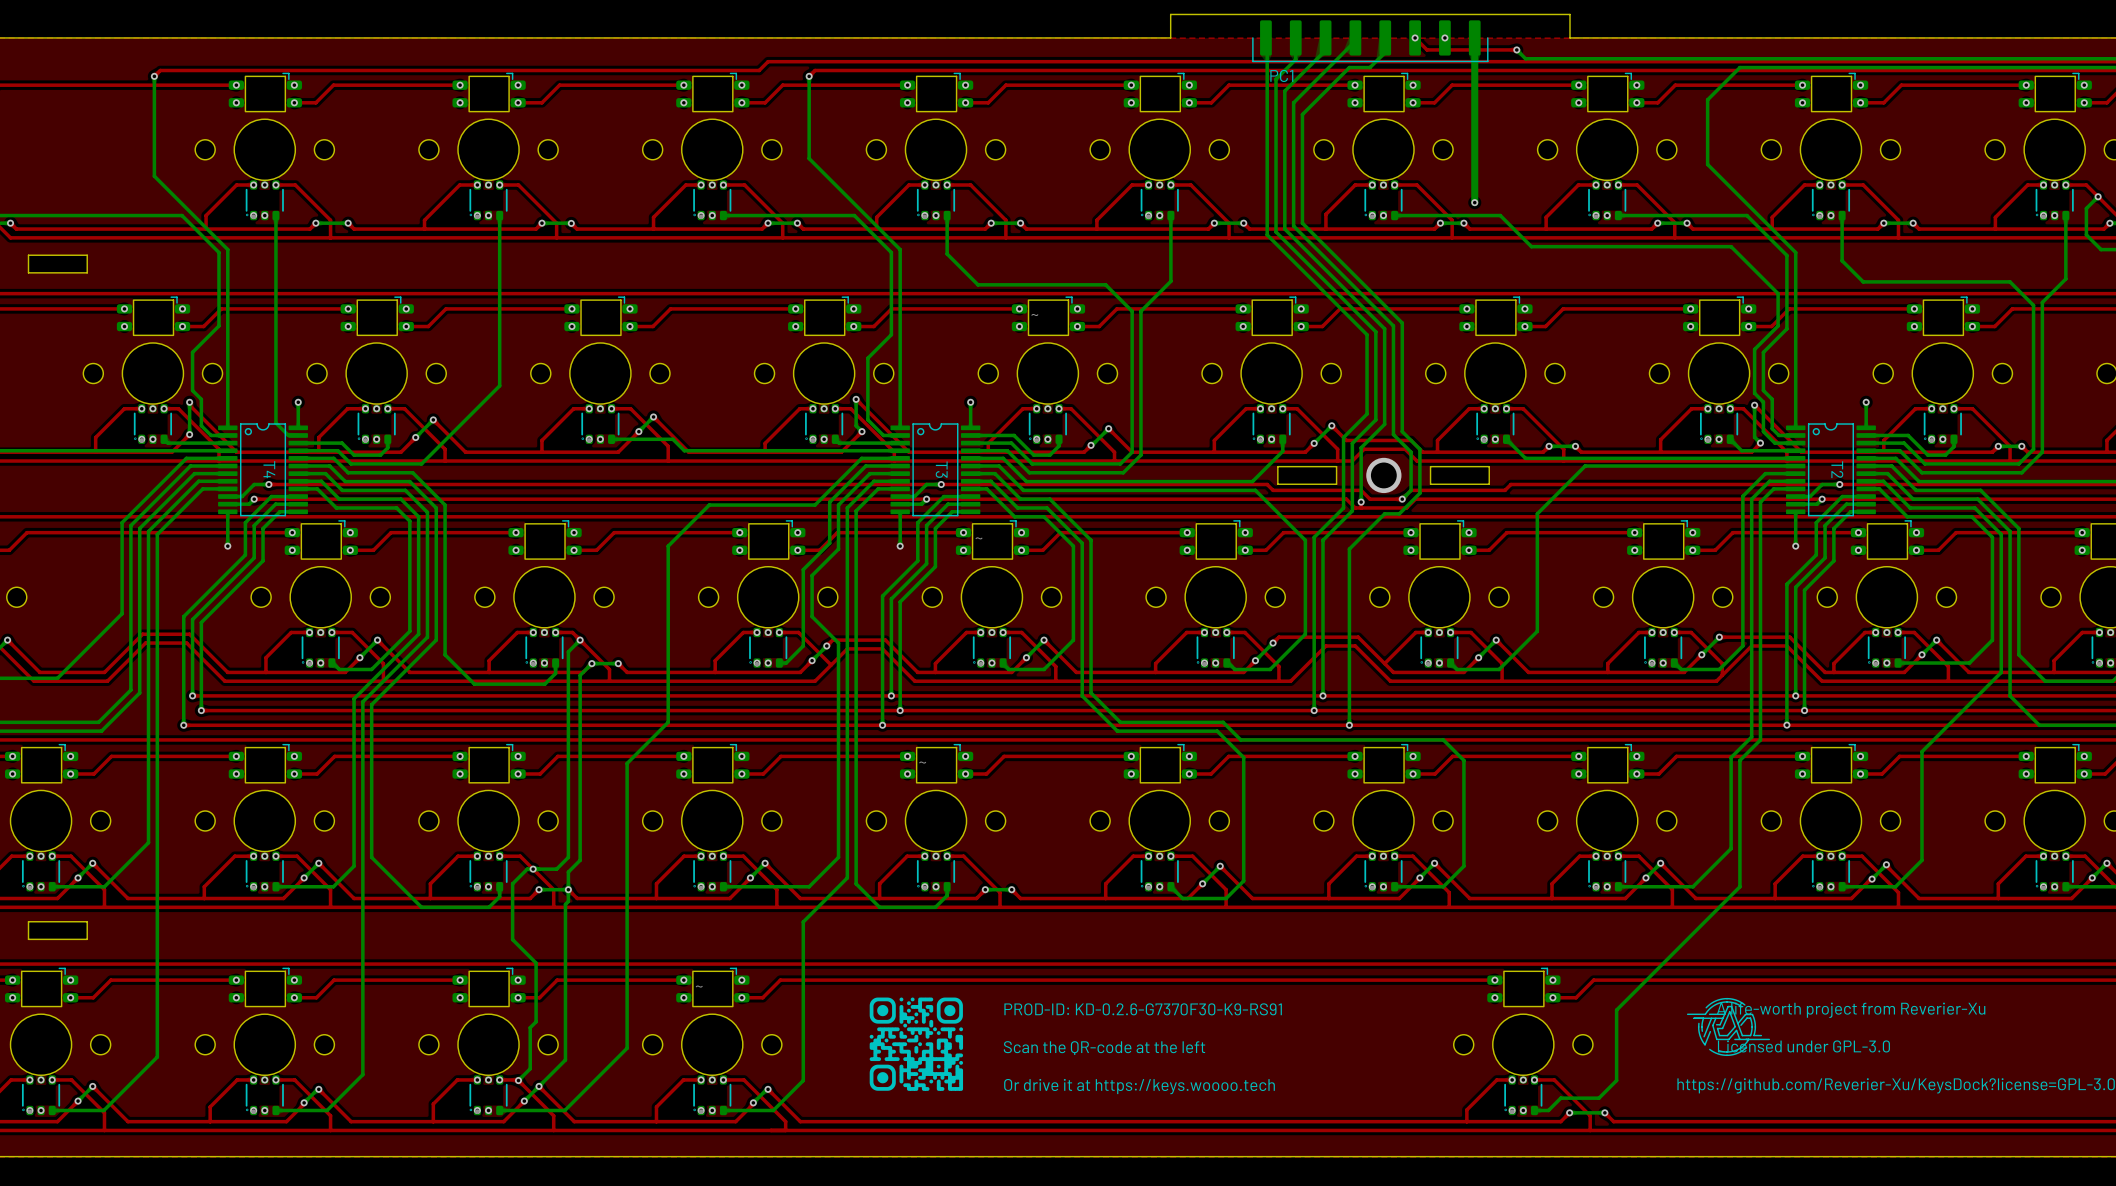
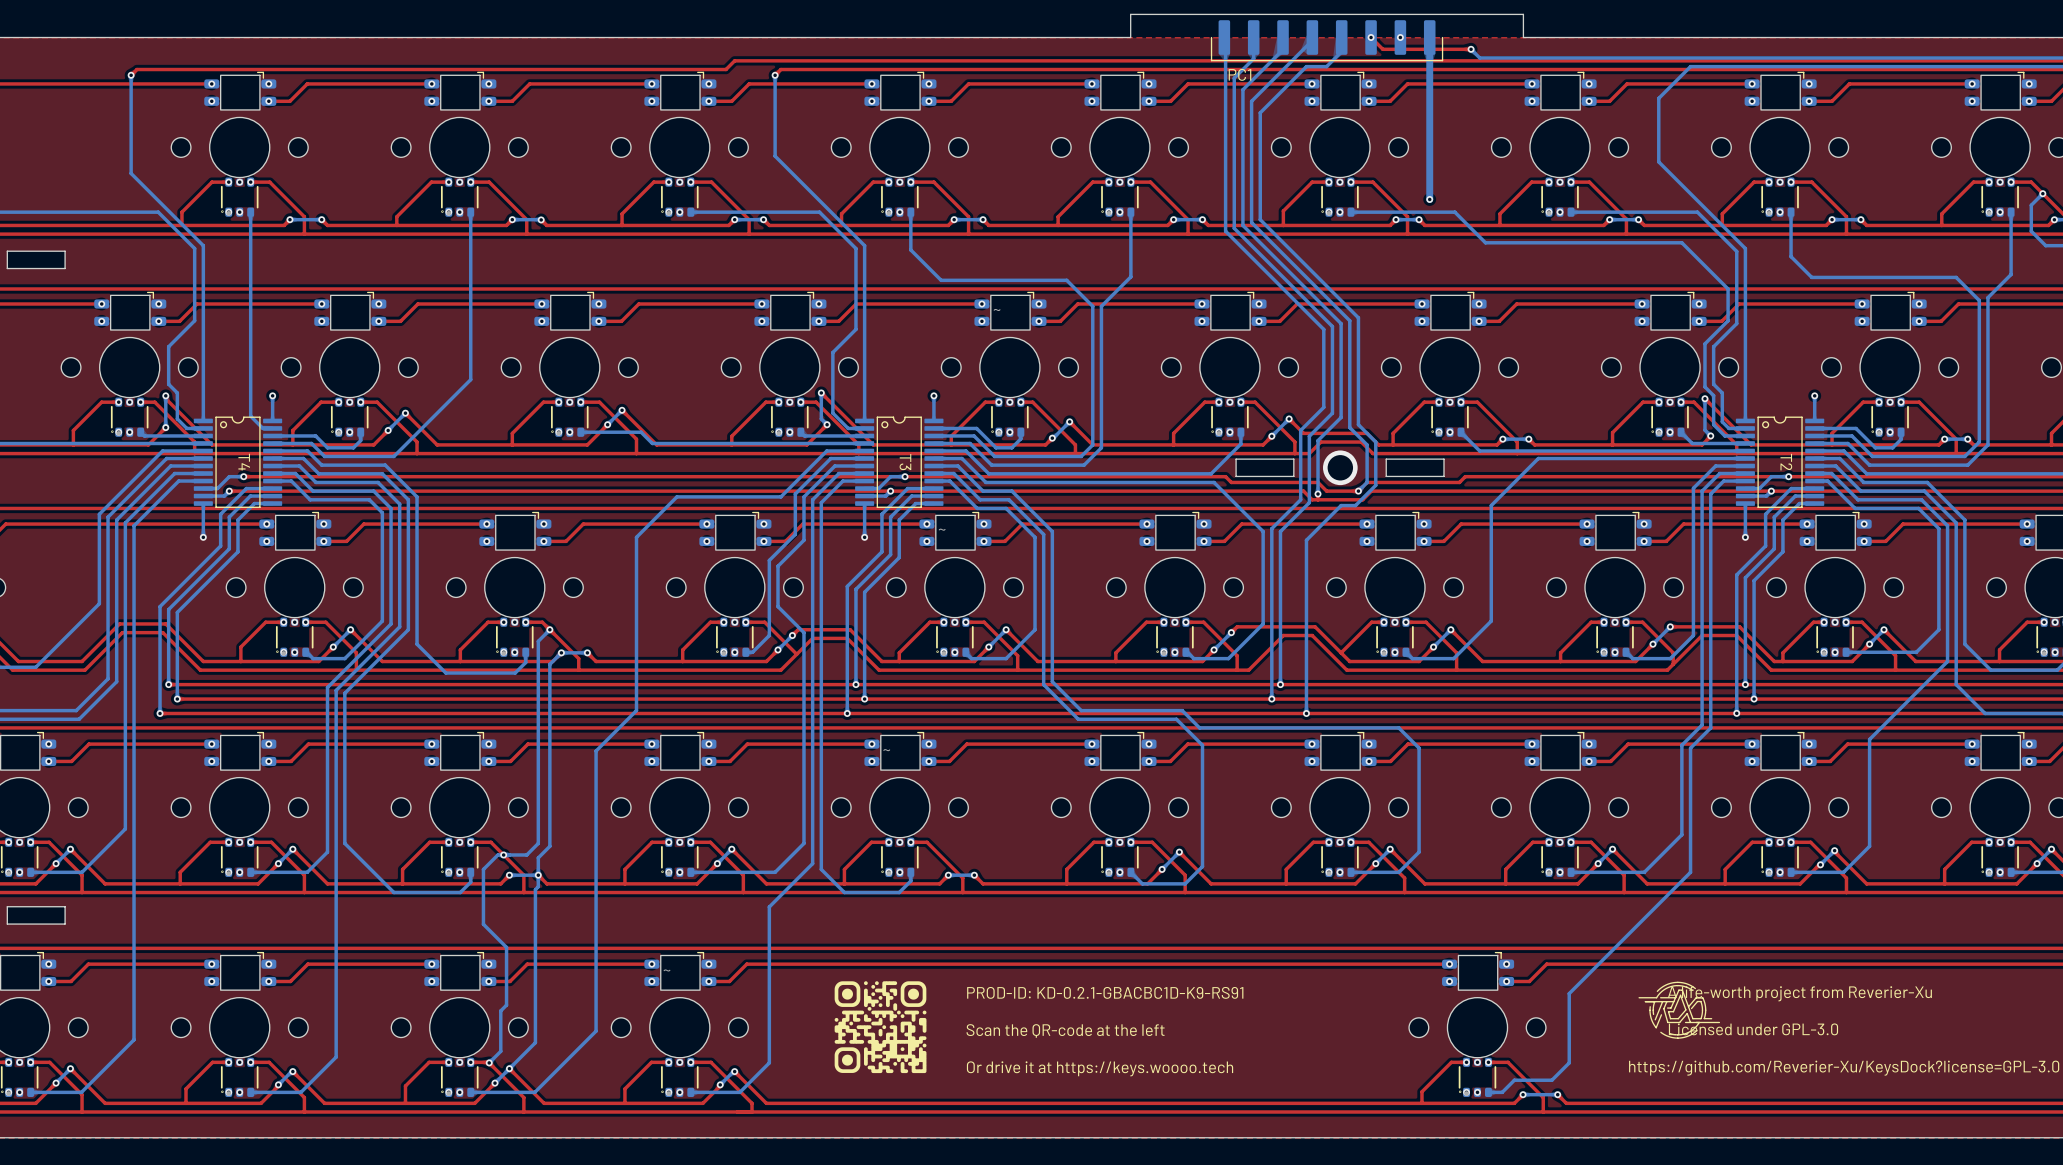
text: PROD-ID: KD-0.2.6-G7370F30-K9-RS91 (1143, 1009) -> PROD-ID: KD-0.2.1-GBACBC1D-K9-RS91 (1105, 992)

